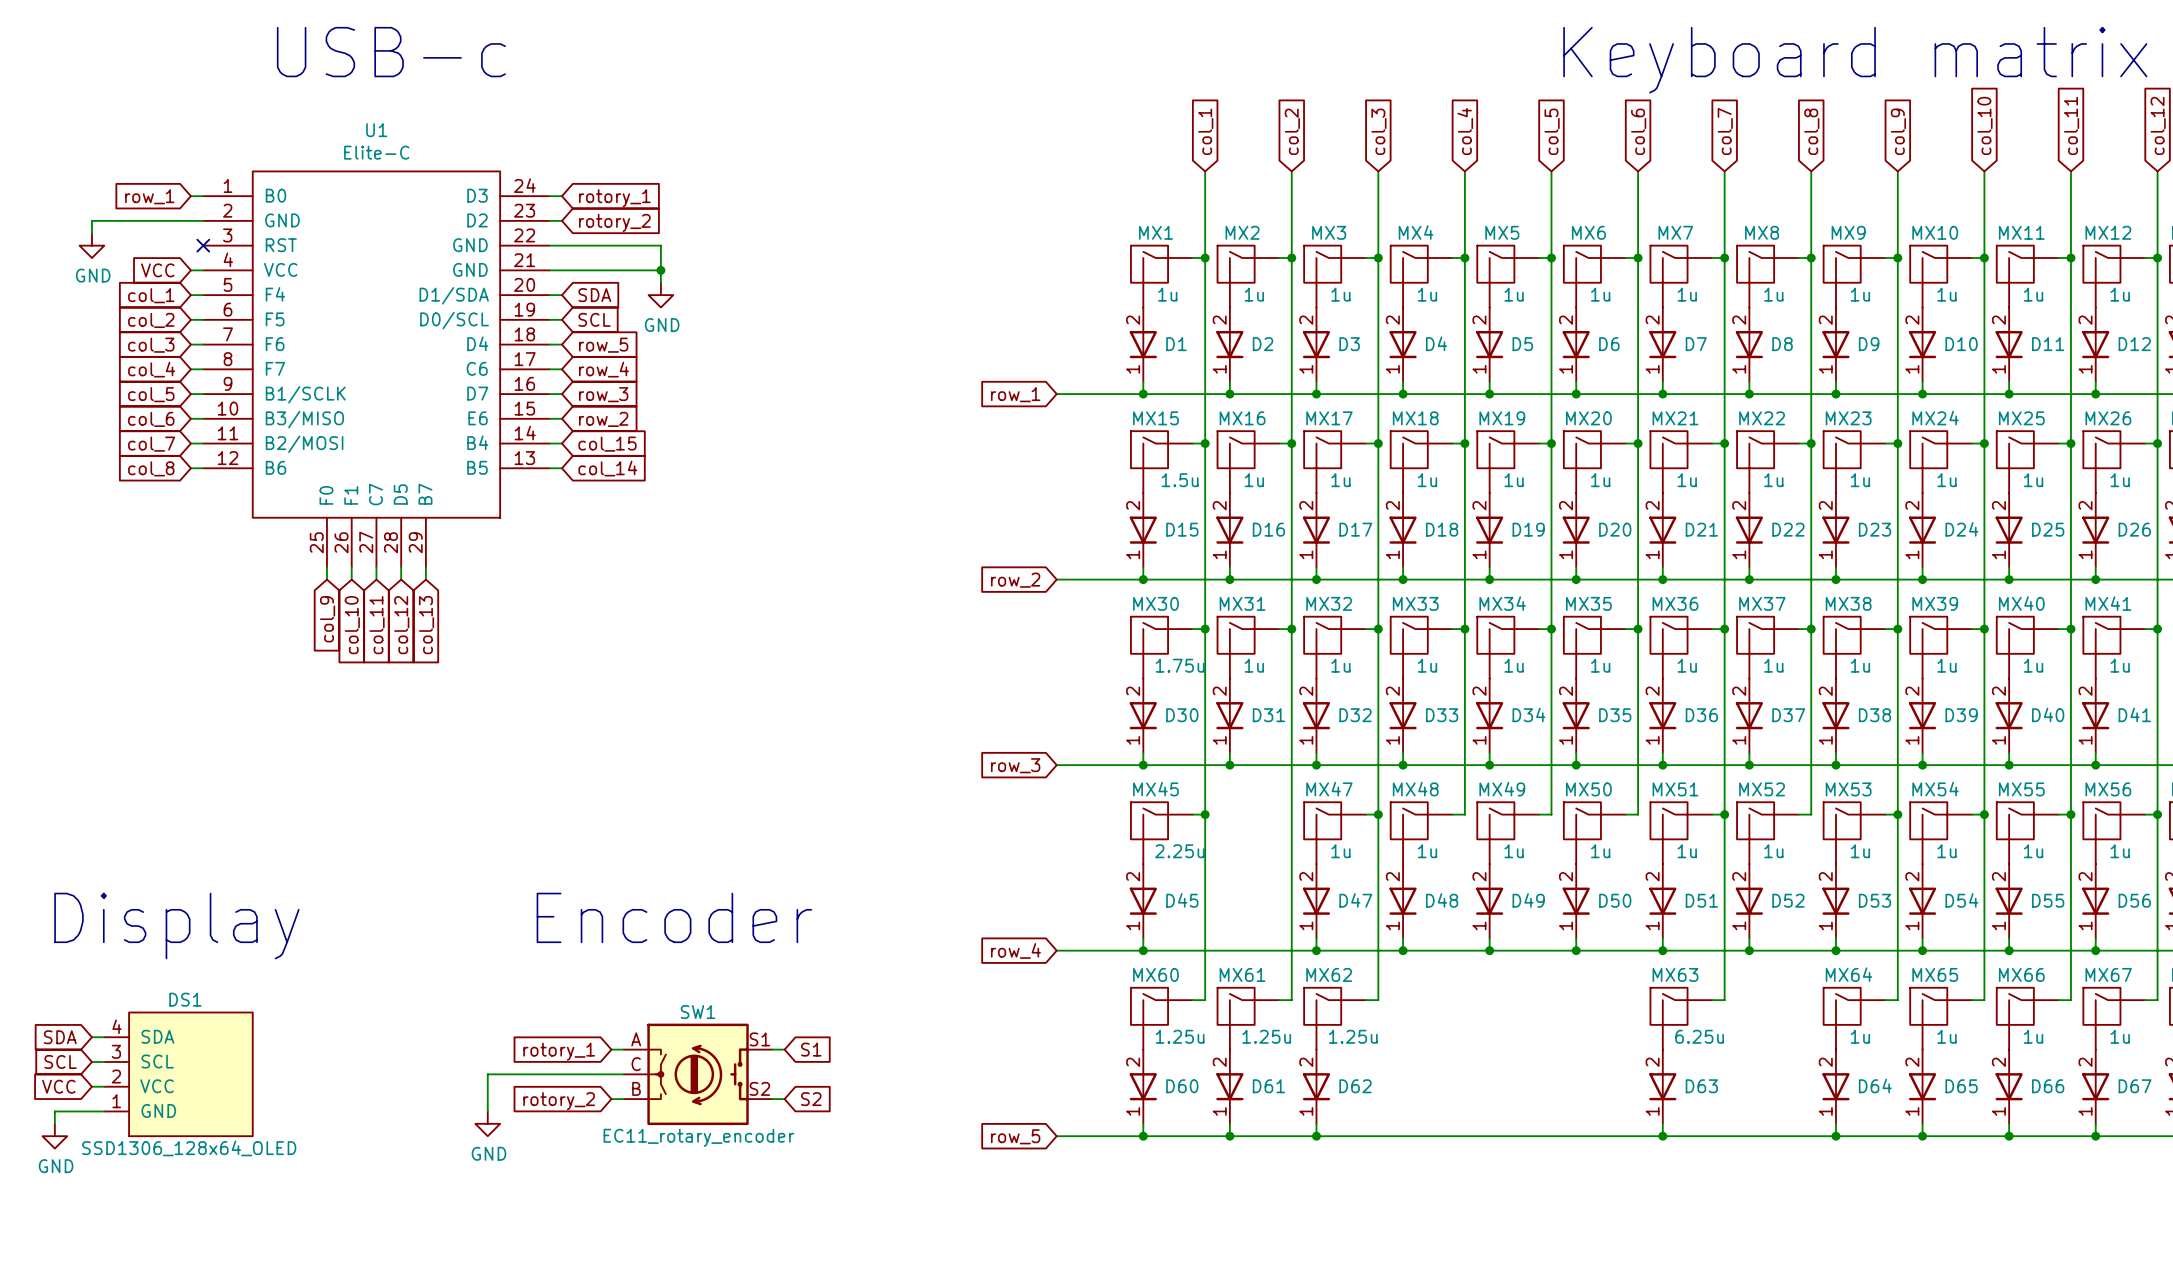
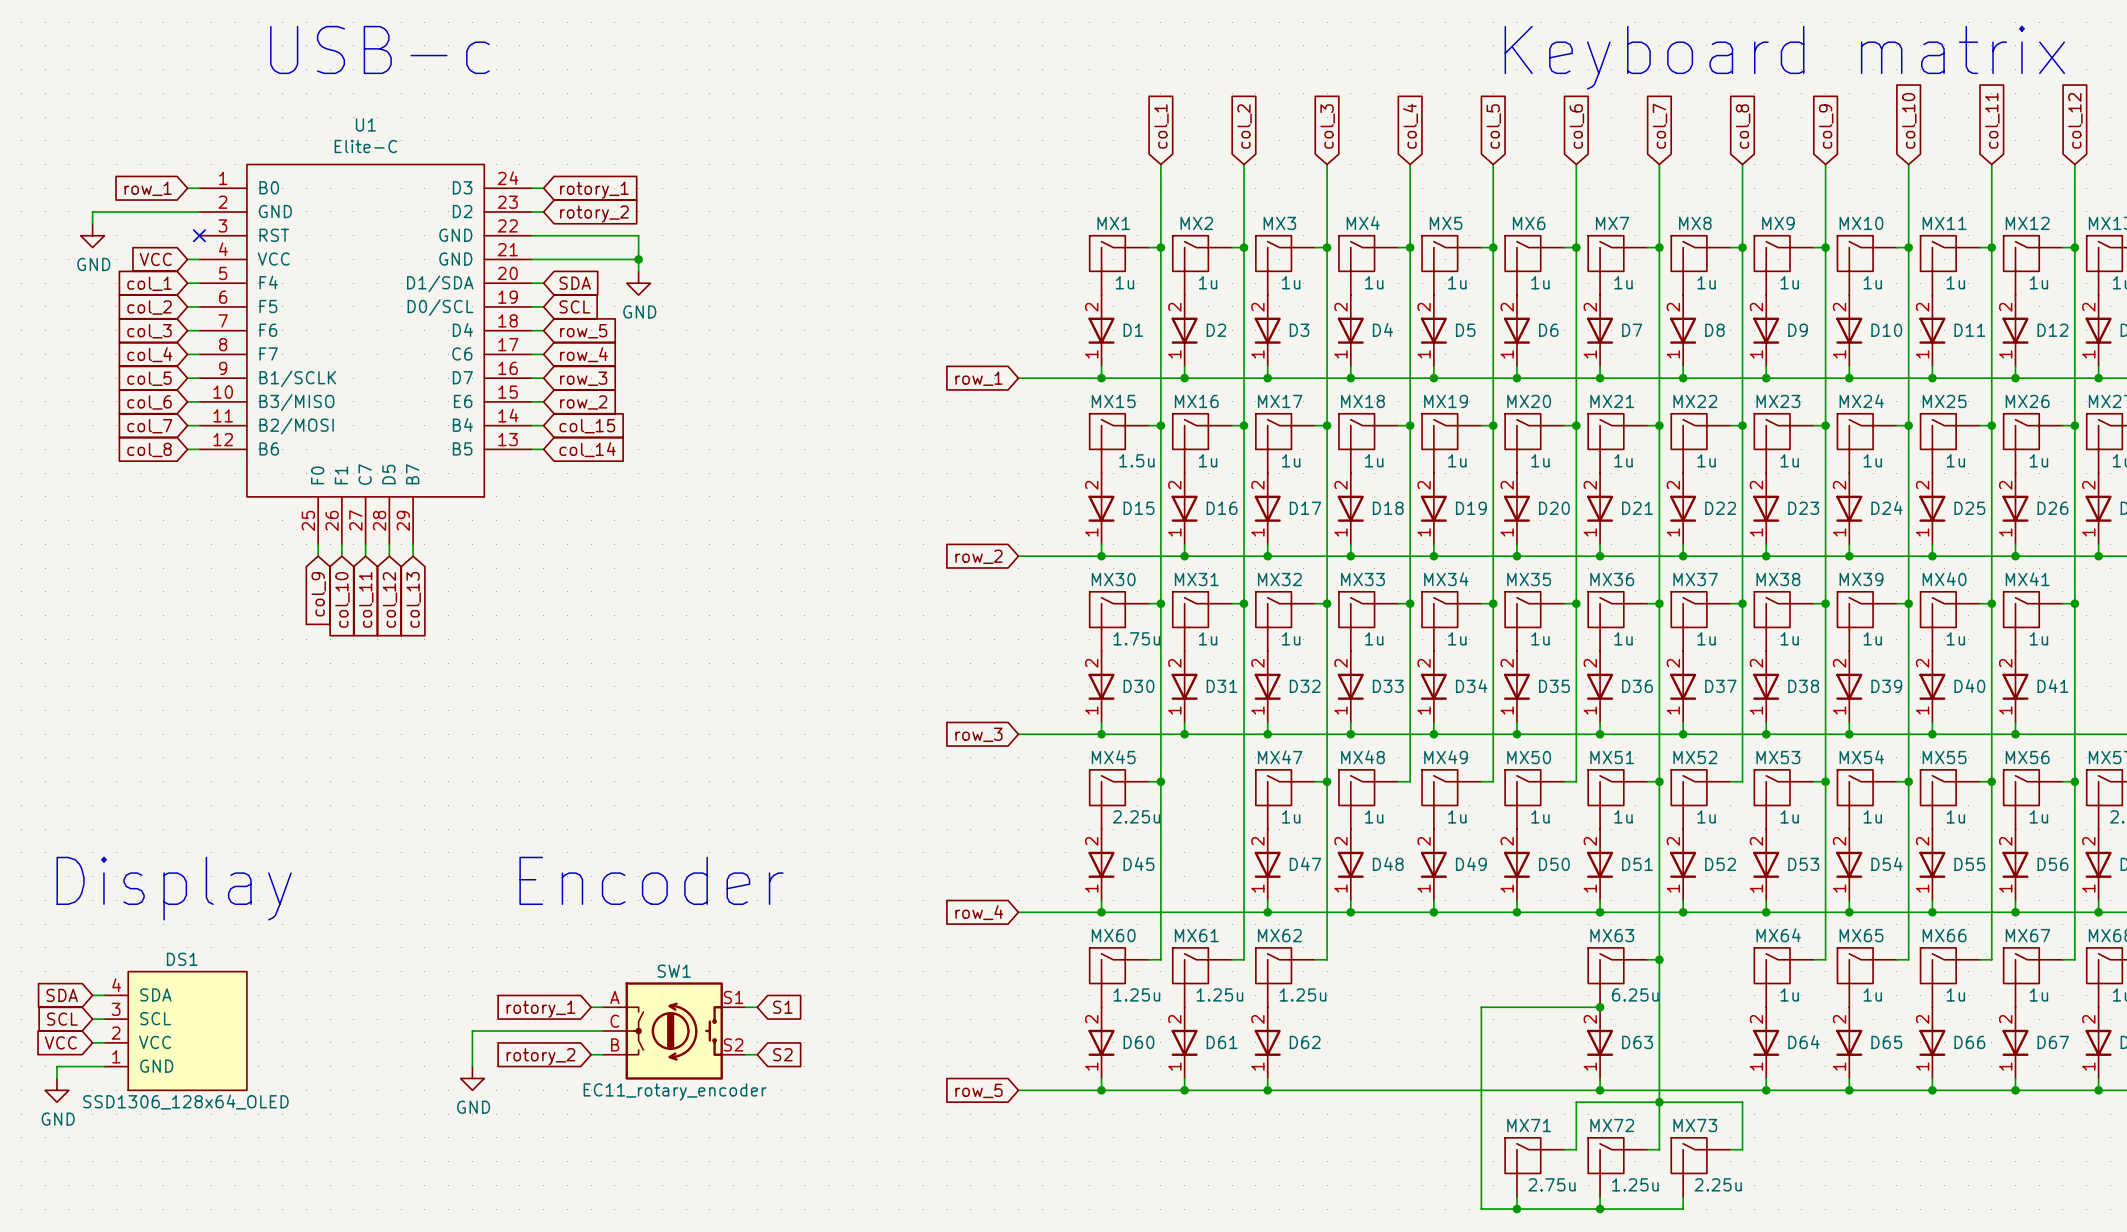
wire: none -> (1659, 959) (1659, 1149) (1647, 1149)
junction: none -> (1659, 959)
wire: none -> (1600, 1007) (1481, 1007) (1481, 1209) (1683, 1209) (1683, 1197)
junction: none -> (1600, 1007)
junction: none -> (1659, 1102)
wire: none -> (1564, 1149) (1576, 1149) (1576, 1102) (1742, 1102) (1742, 1149) (1730, 1149)
MX71: none -> (1534, 1167)
MX72: none -> (1617, 1167)
MX73: none -> (1700, 1167)
wire: none -> (1516, 1197) (1516, 1209)
wire: none -> (1600, 1197) (1600, 1209)
junction: none -> (1516, 1209)
junction: none -> (1600, 1209)

